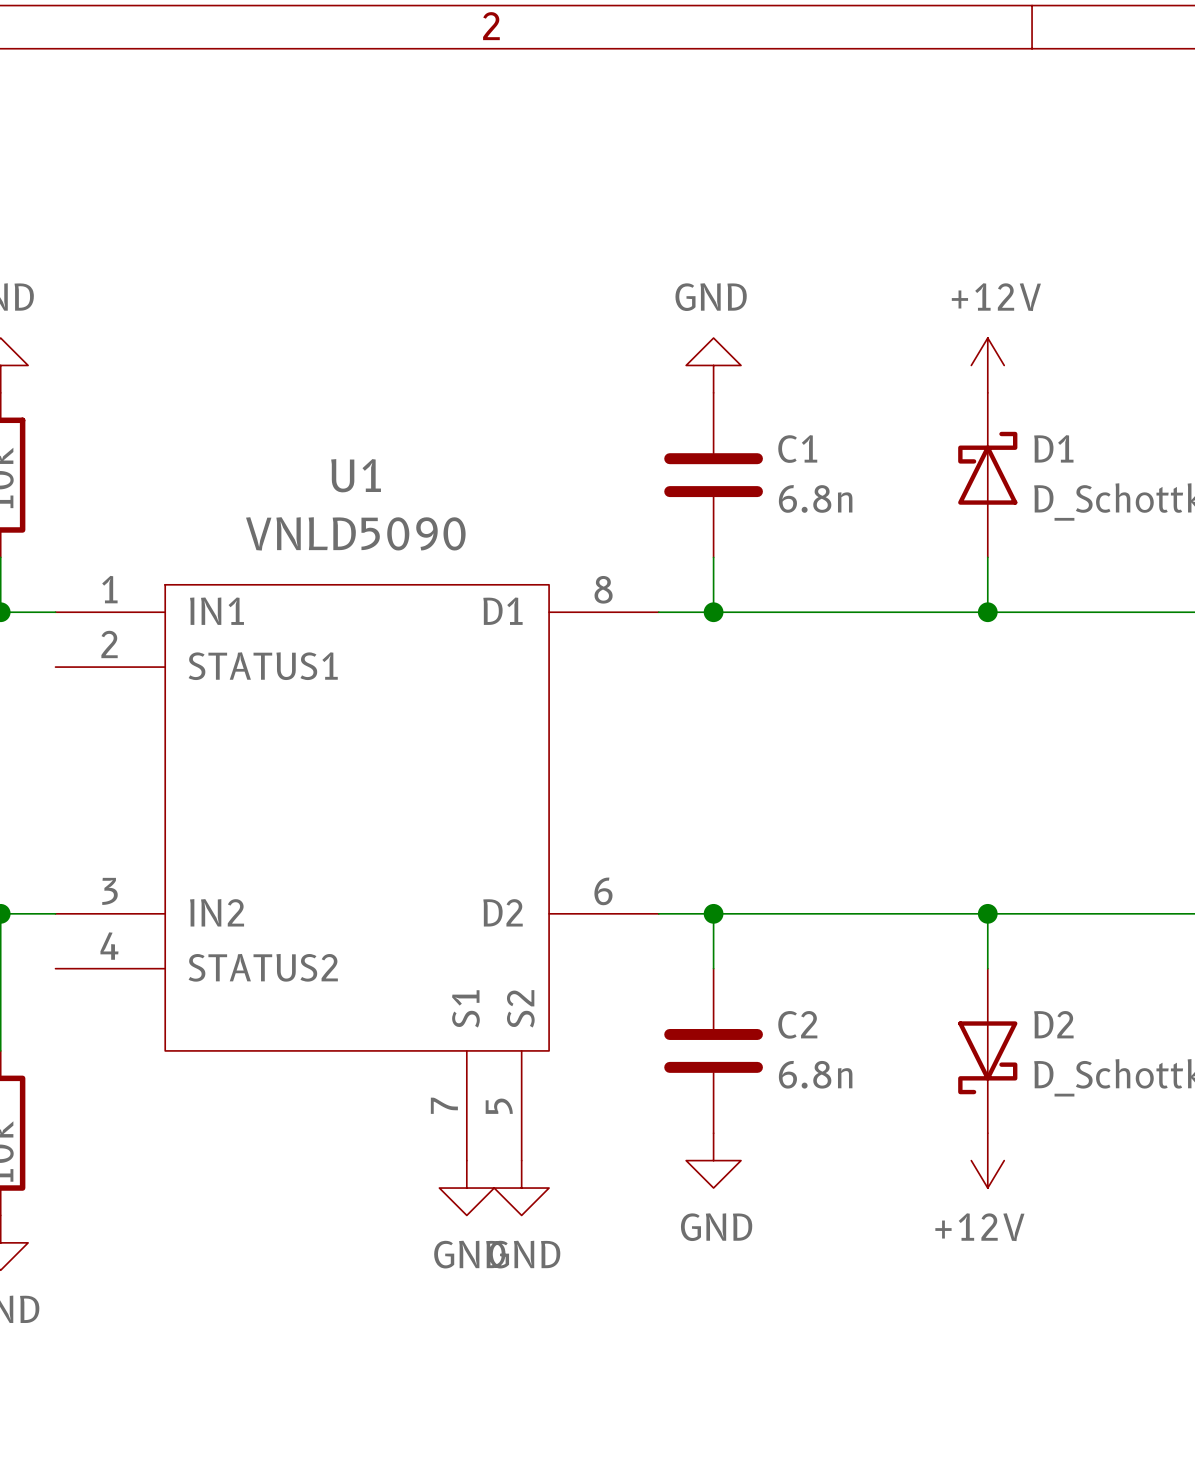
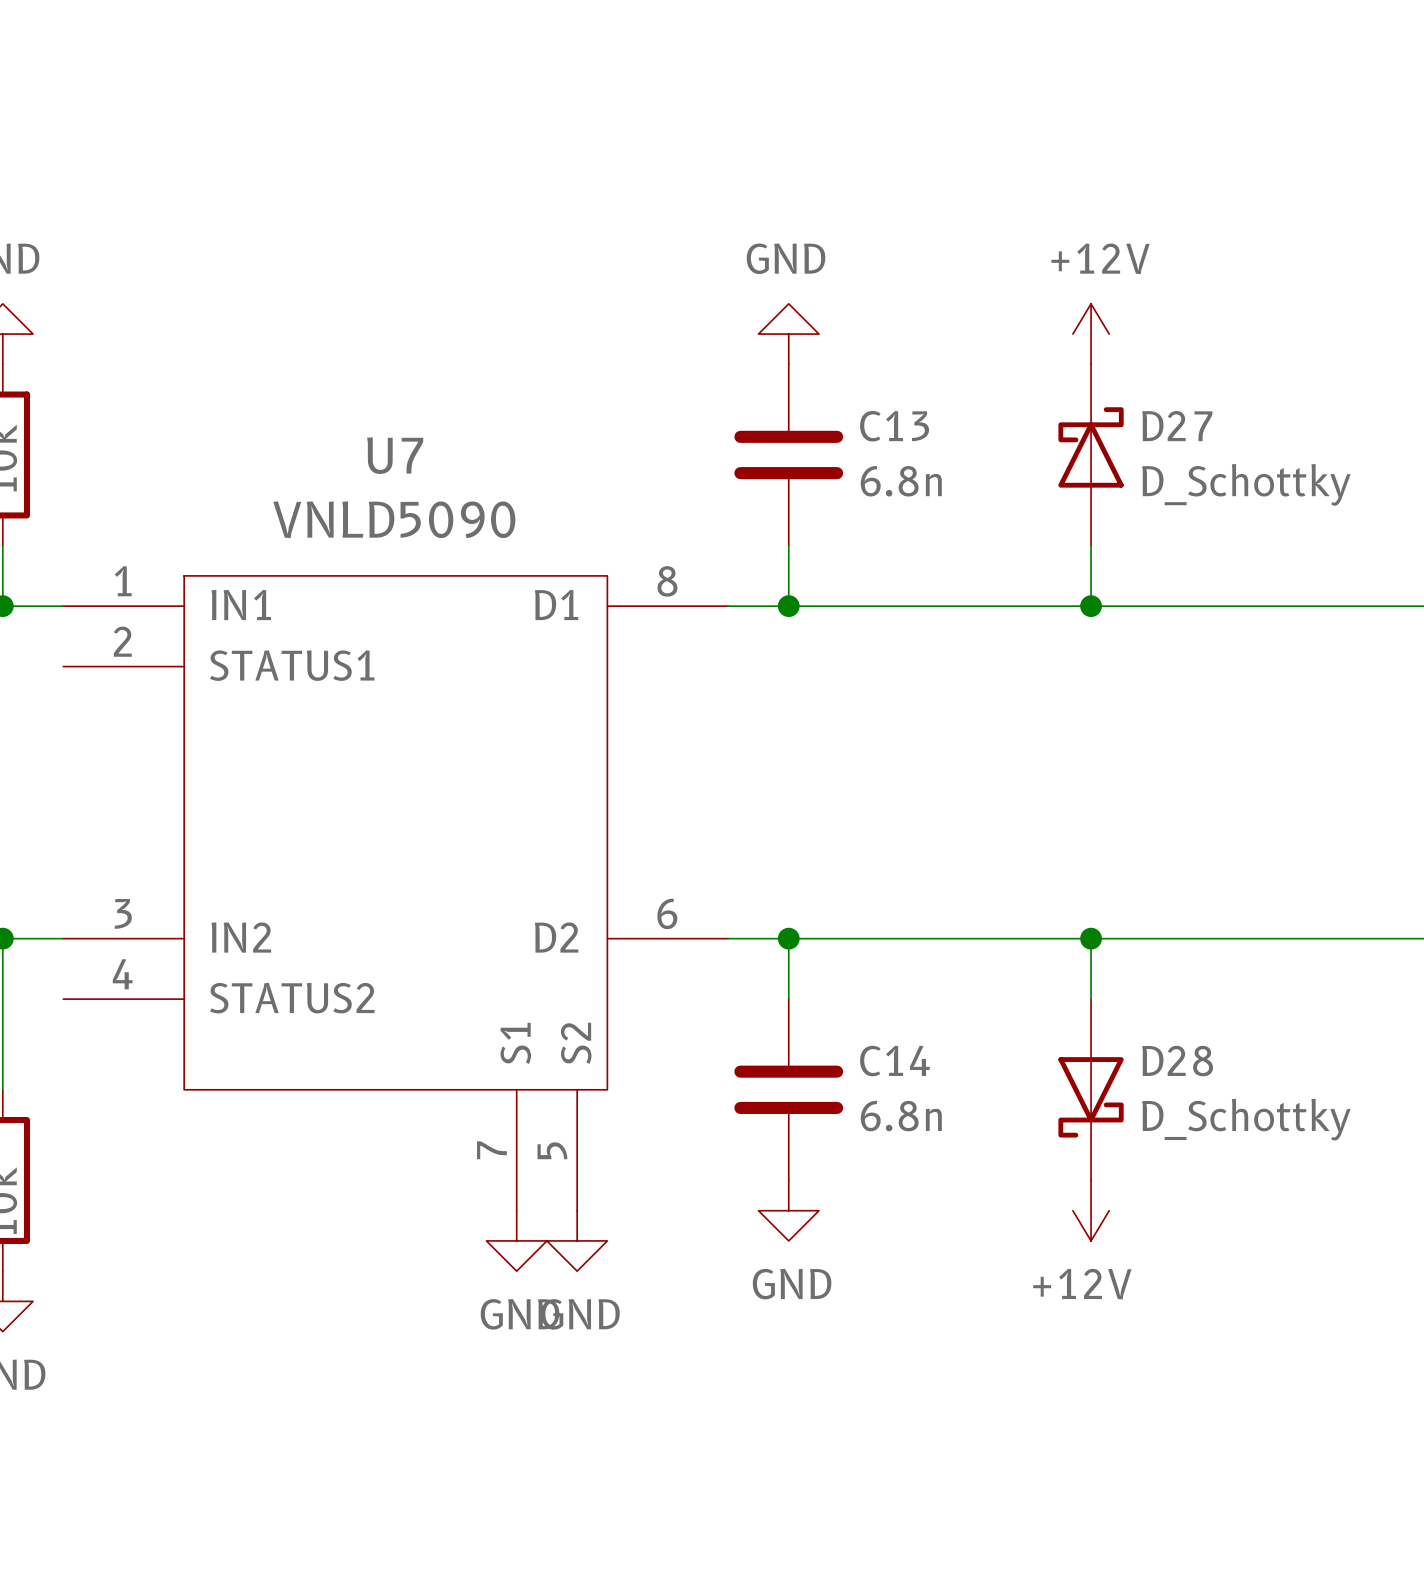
D1 name: D1 (1053, 448) -> D27 (1177, 426)
C1 name: C1 (797, 449) -> C13 (894, 426)
U1 name: U1 (356, 475) -> U7 (395, 455)
C2 name: C2 (797, 1024) -> C14 (894, 1061)
D2 name: D2 (1053, 1024) -> D28 (1177, 1061)

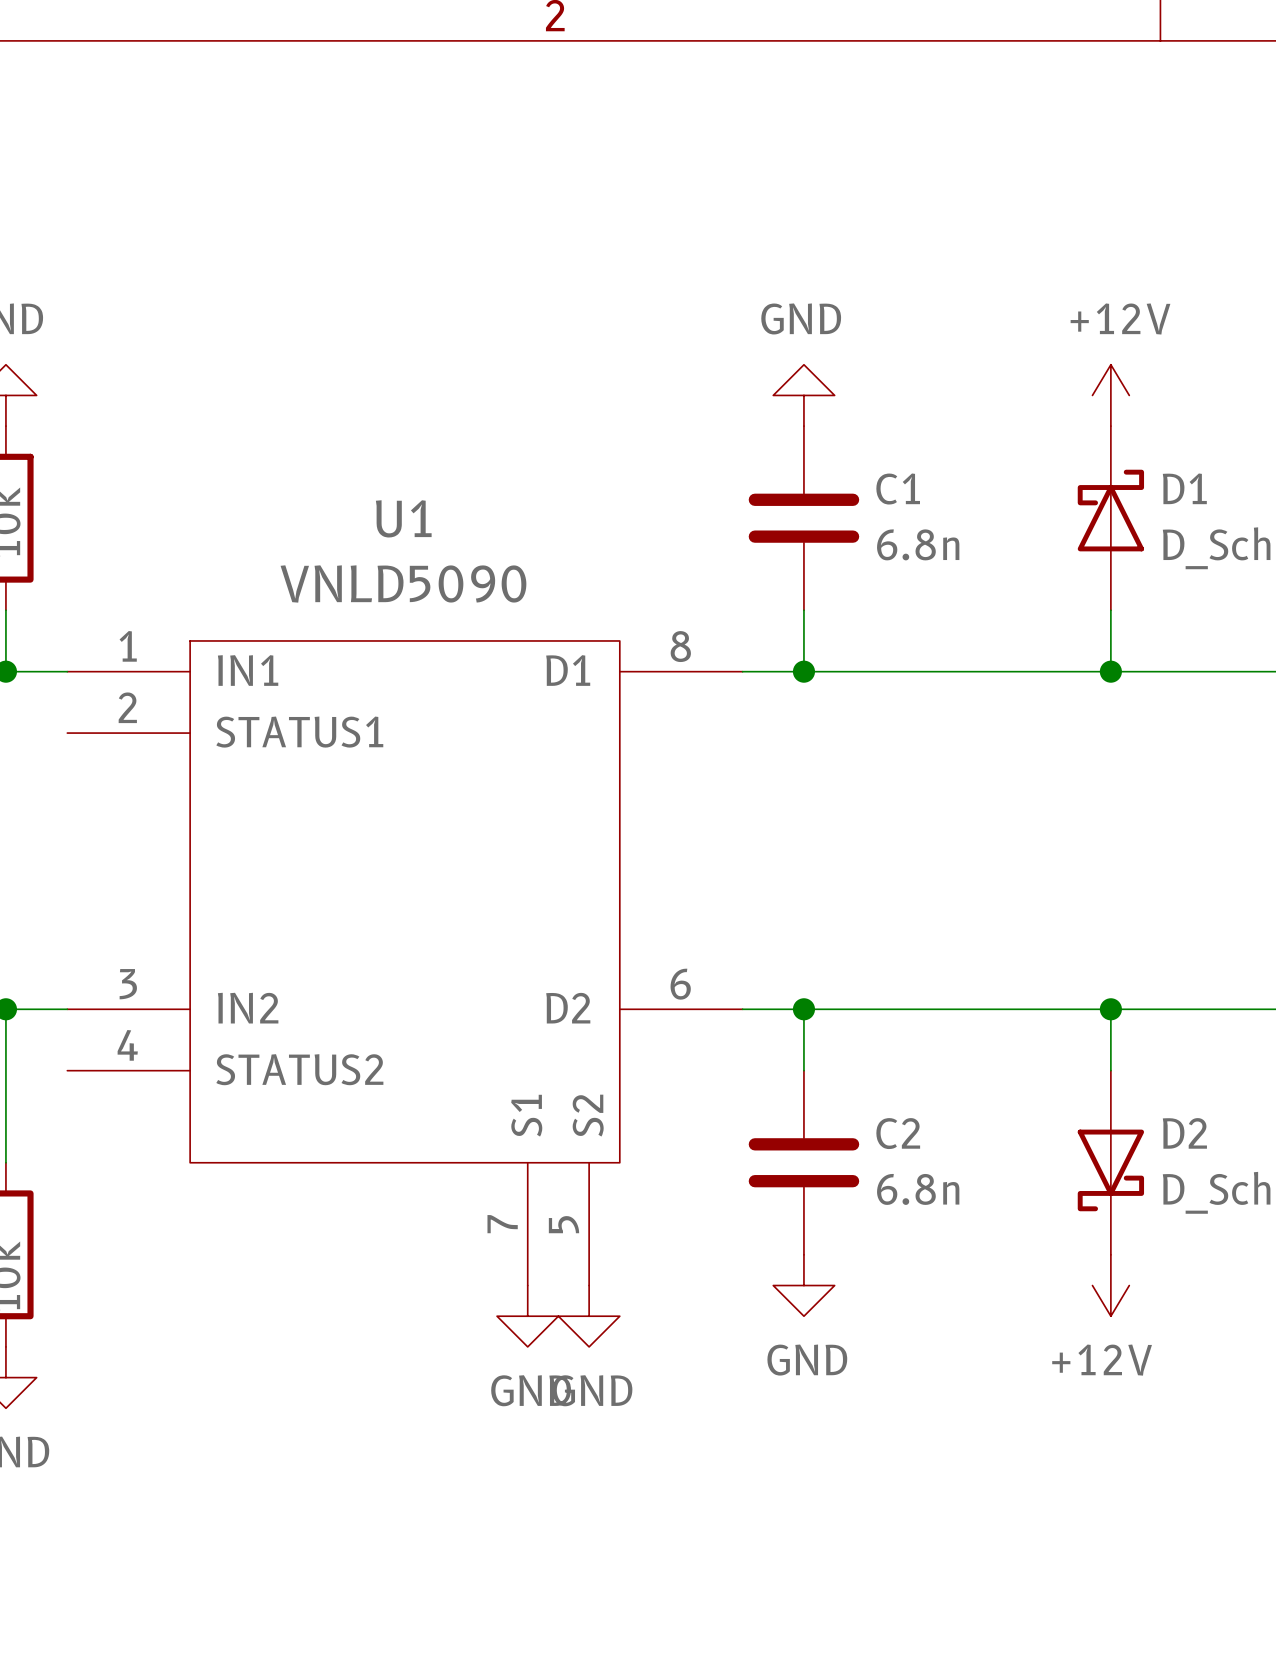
C13 name: C13 (894, 426) -> C1 (898, 488)
D27 name: D27 (1177, 426) -> D1 (1184, 488)
U7 name: U7 (395, 455) -> U1 (403, 518)
C14 name: C14 (894, 1061) -> C2 (898, 1133)
D28 name: D28 (1177, 1061) -> D2 (1184, 1133)

